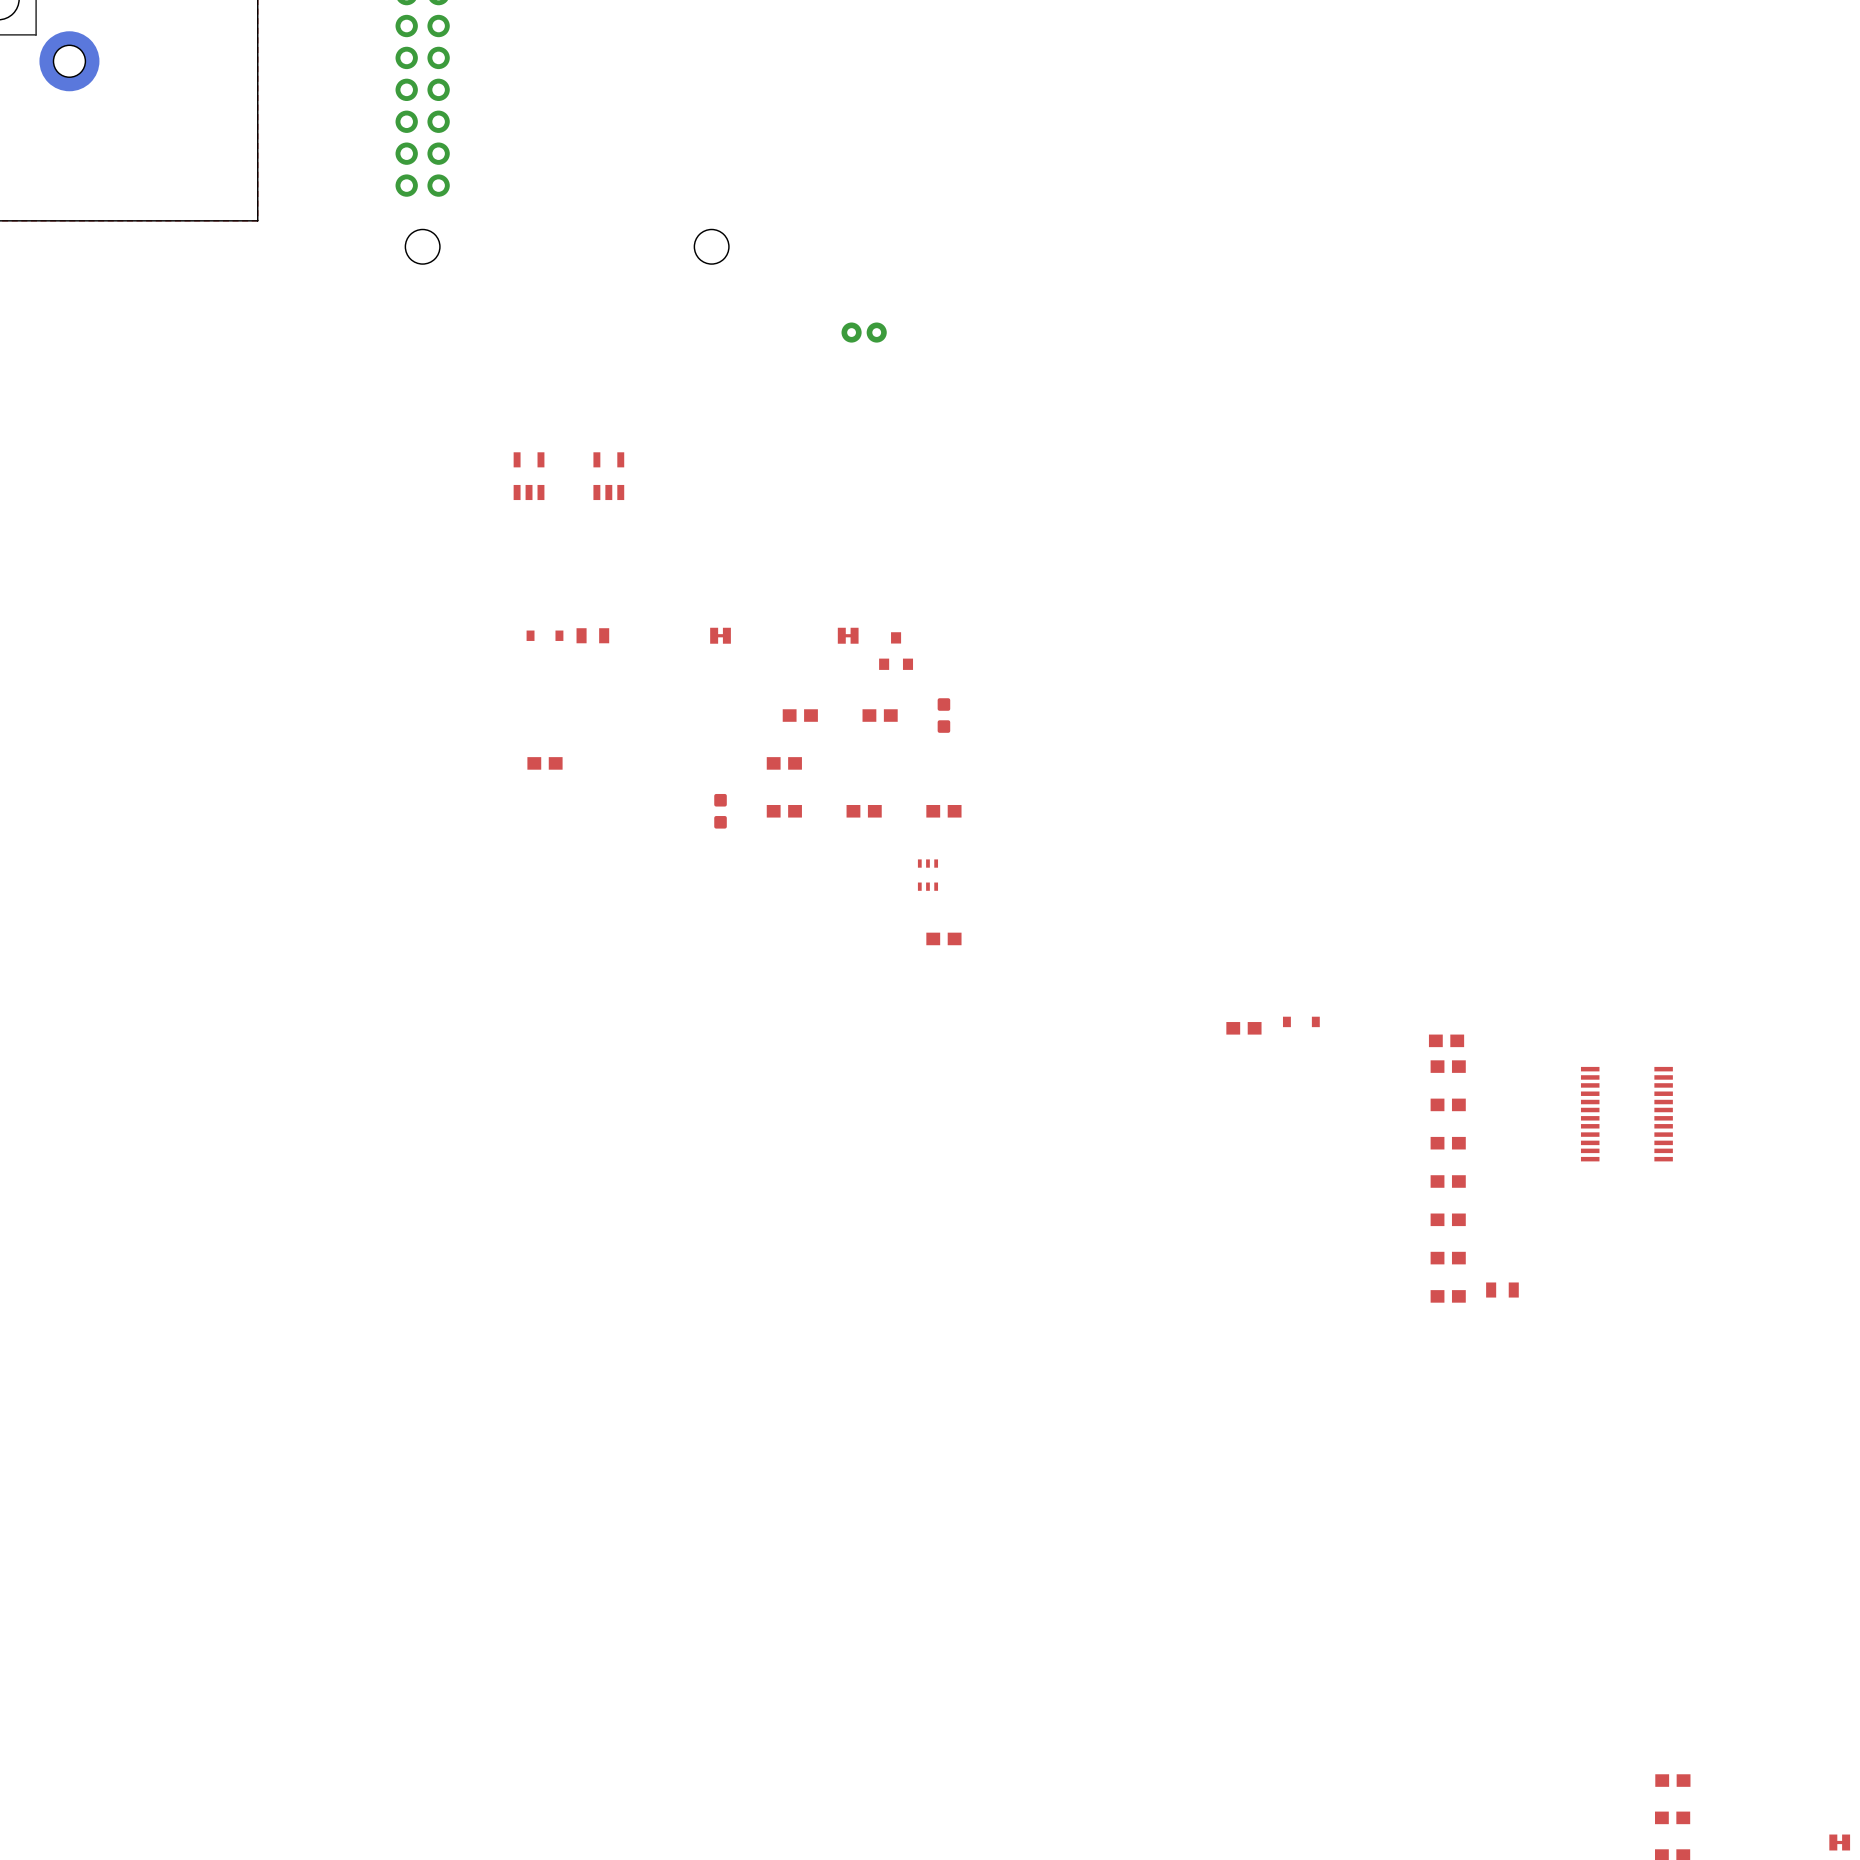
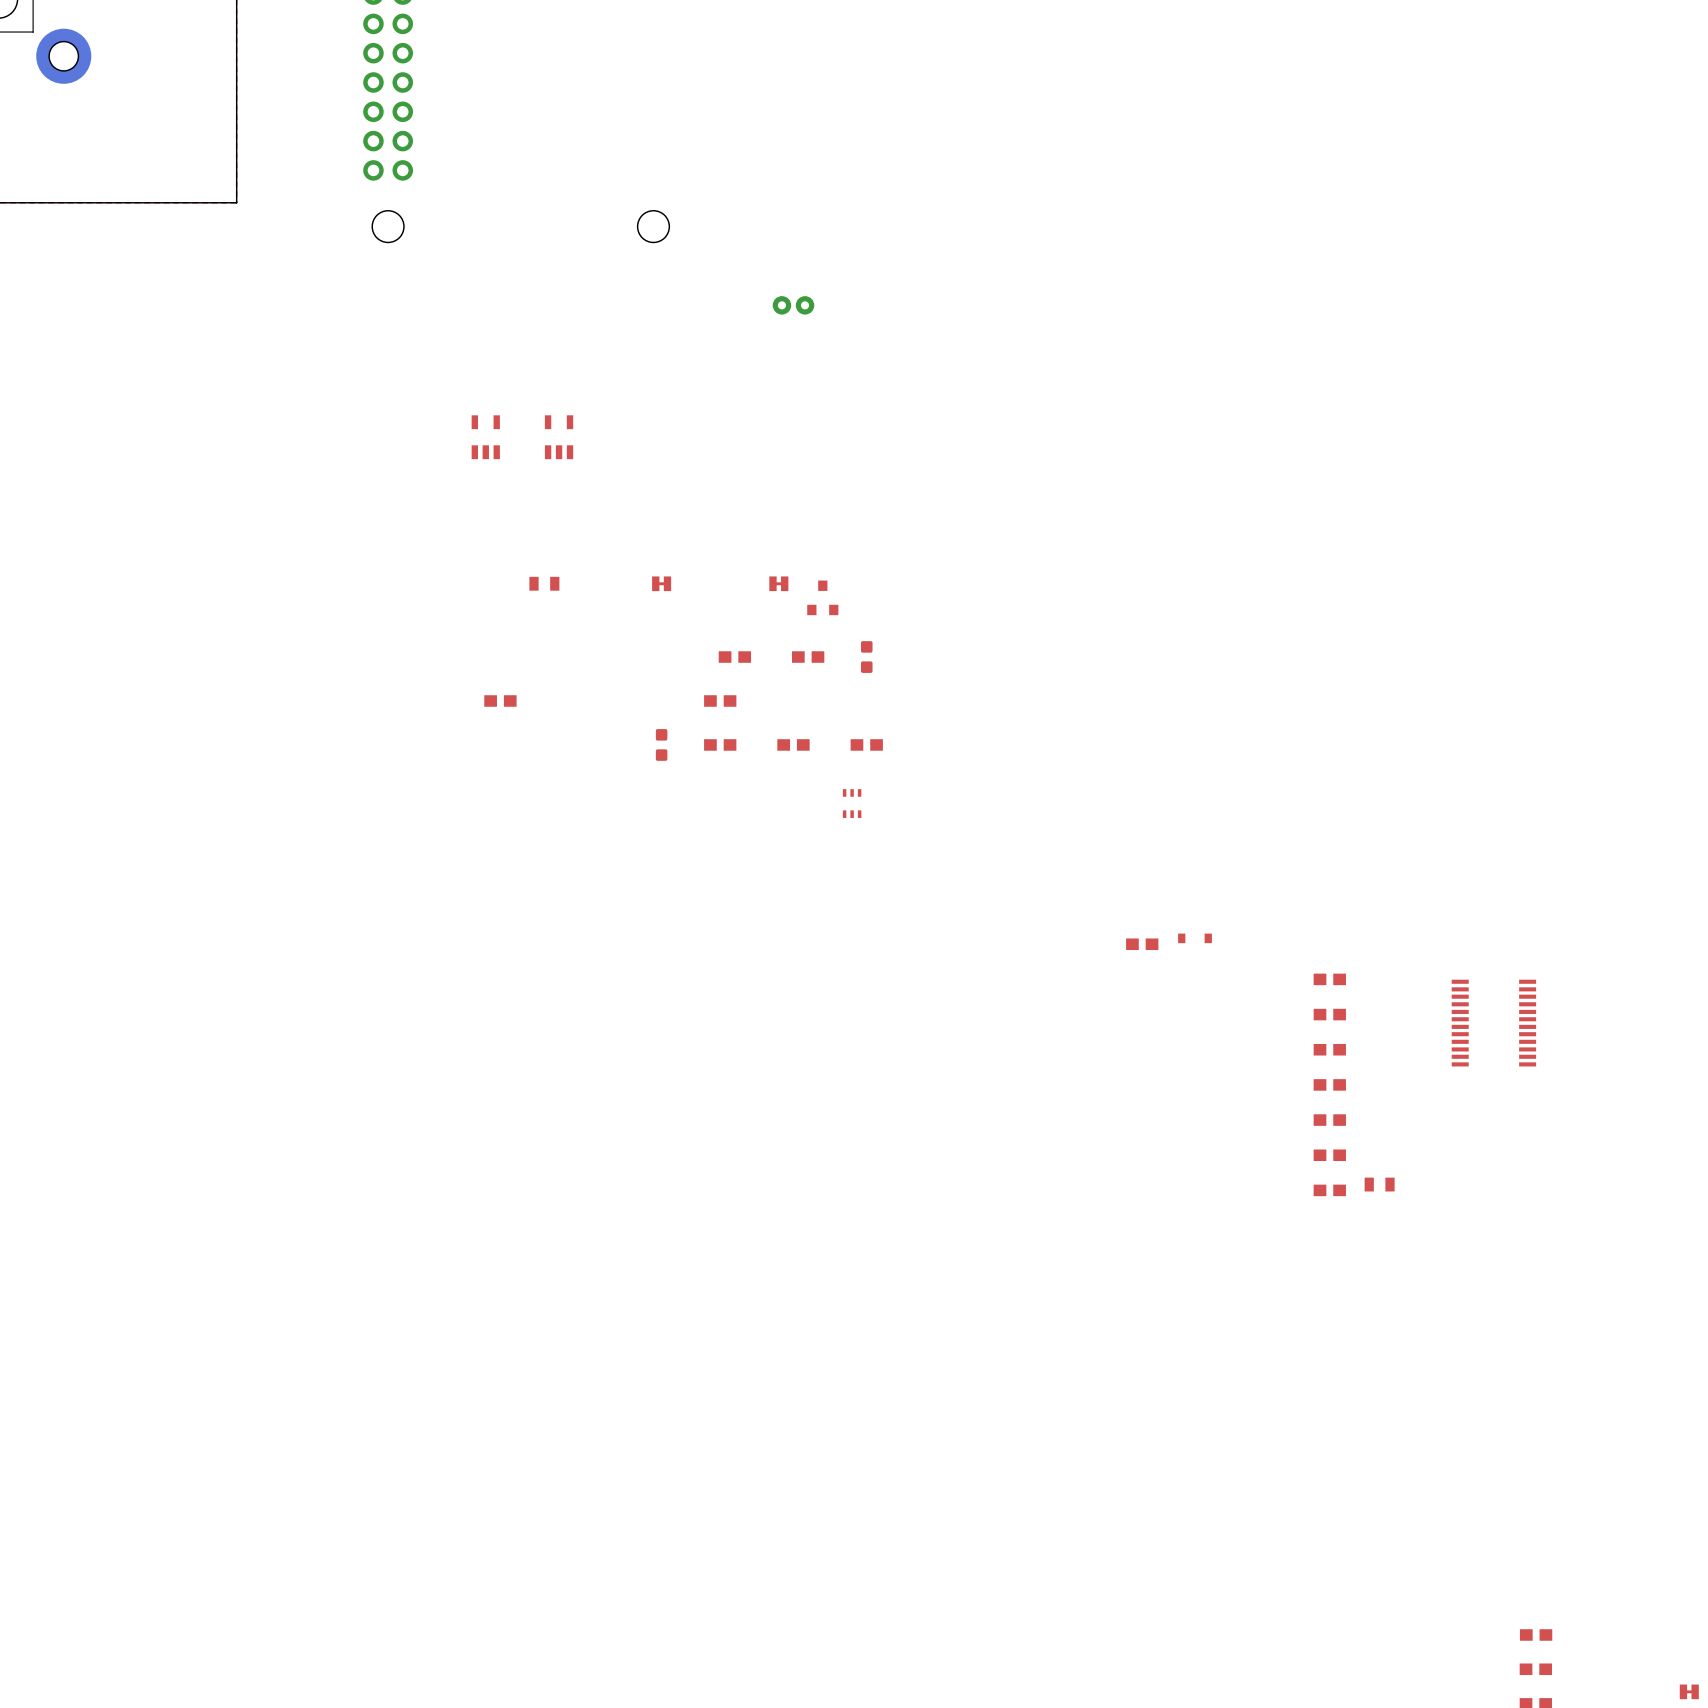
part: (544, 635) -> none
part: (943, 938) -> none
part: (1446, 1040) -> none

